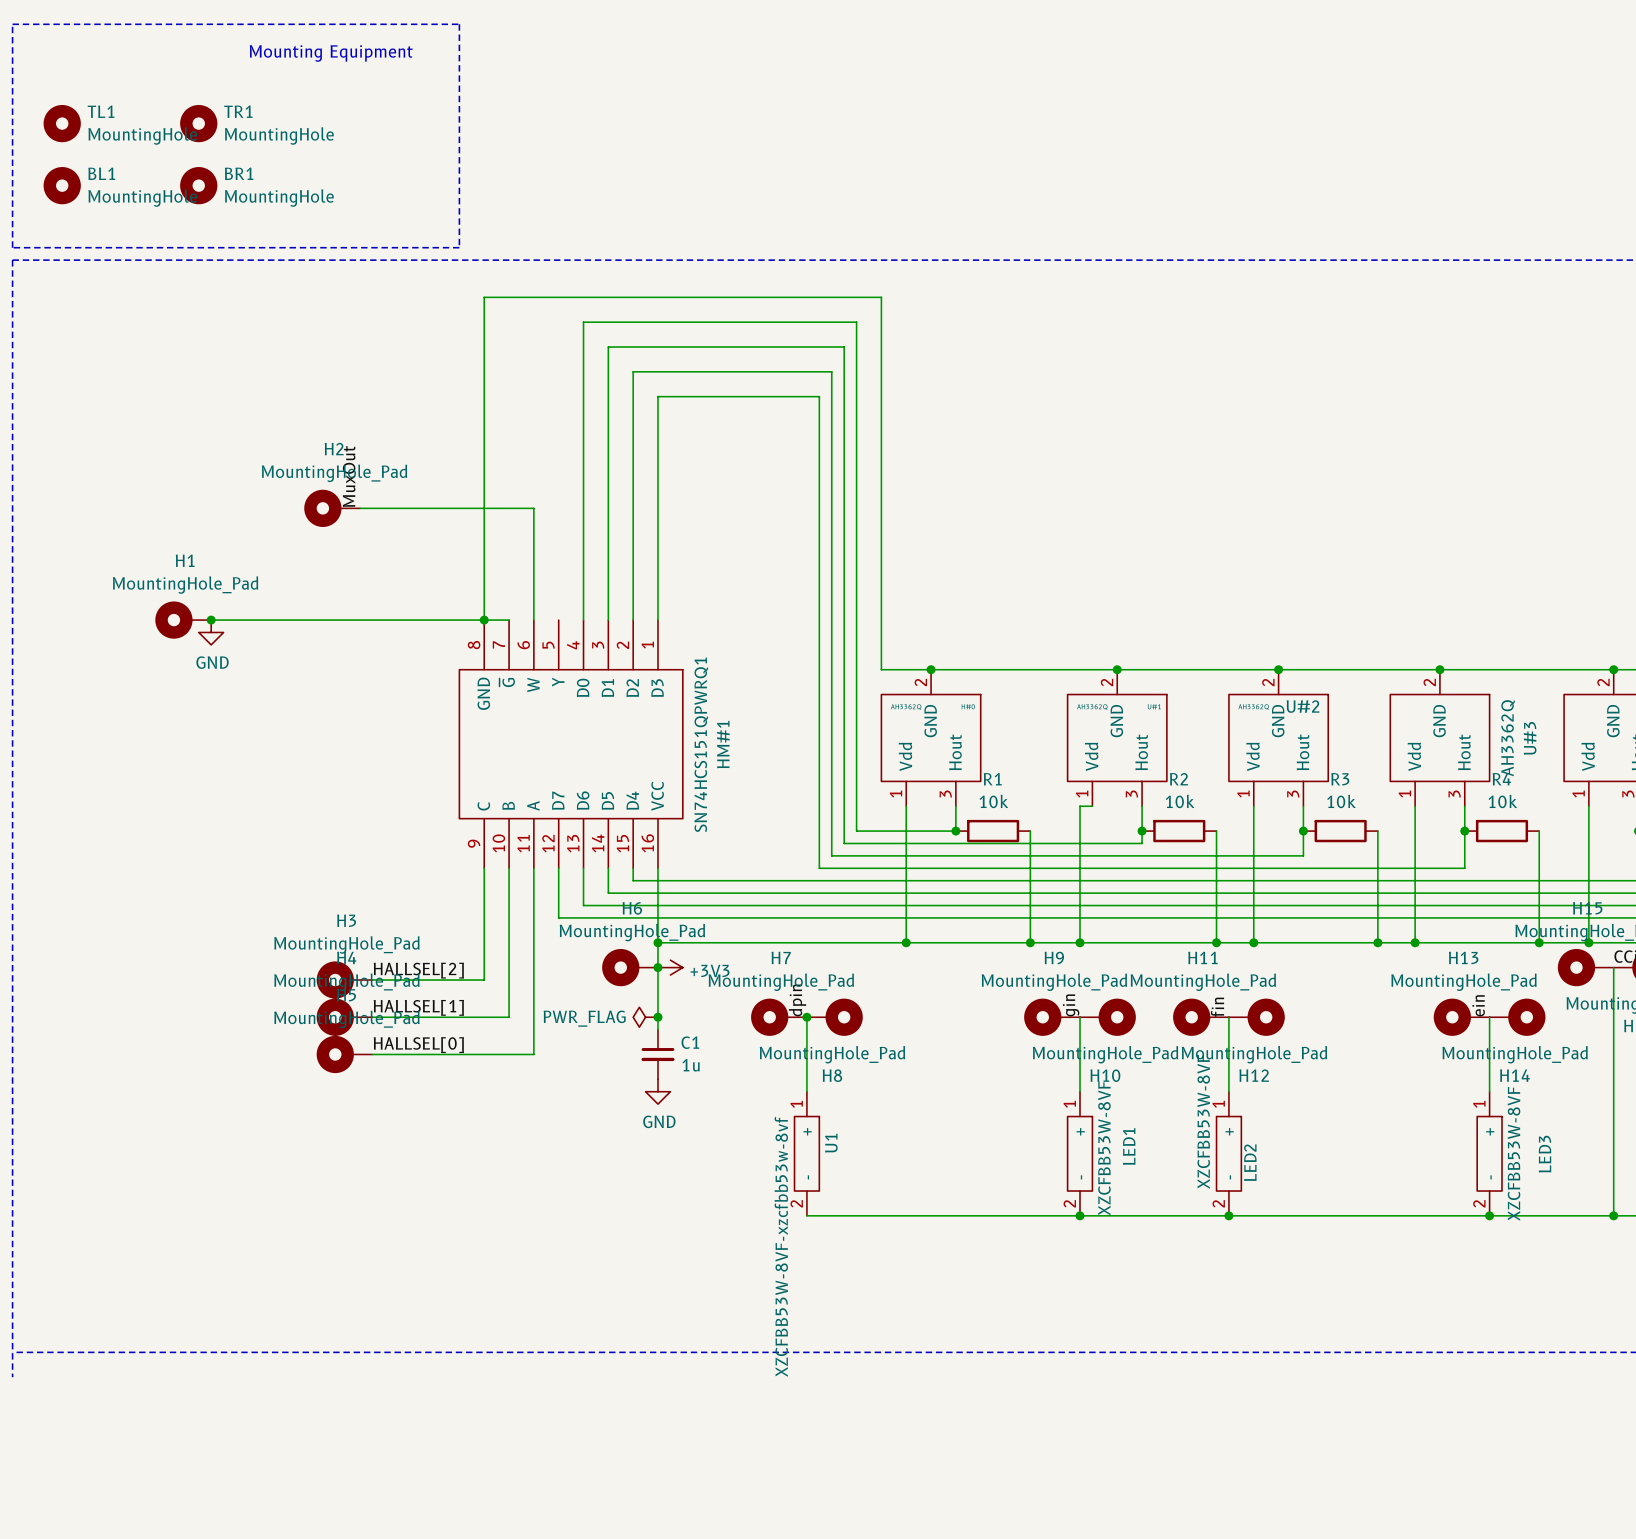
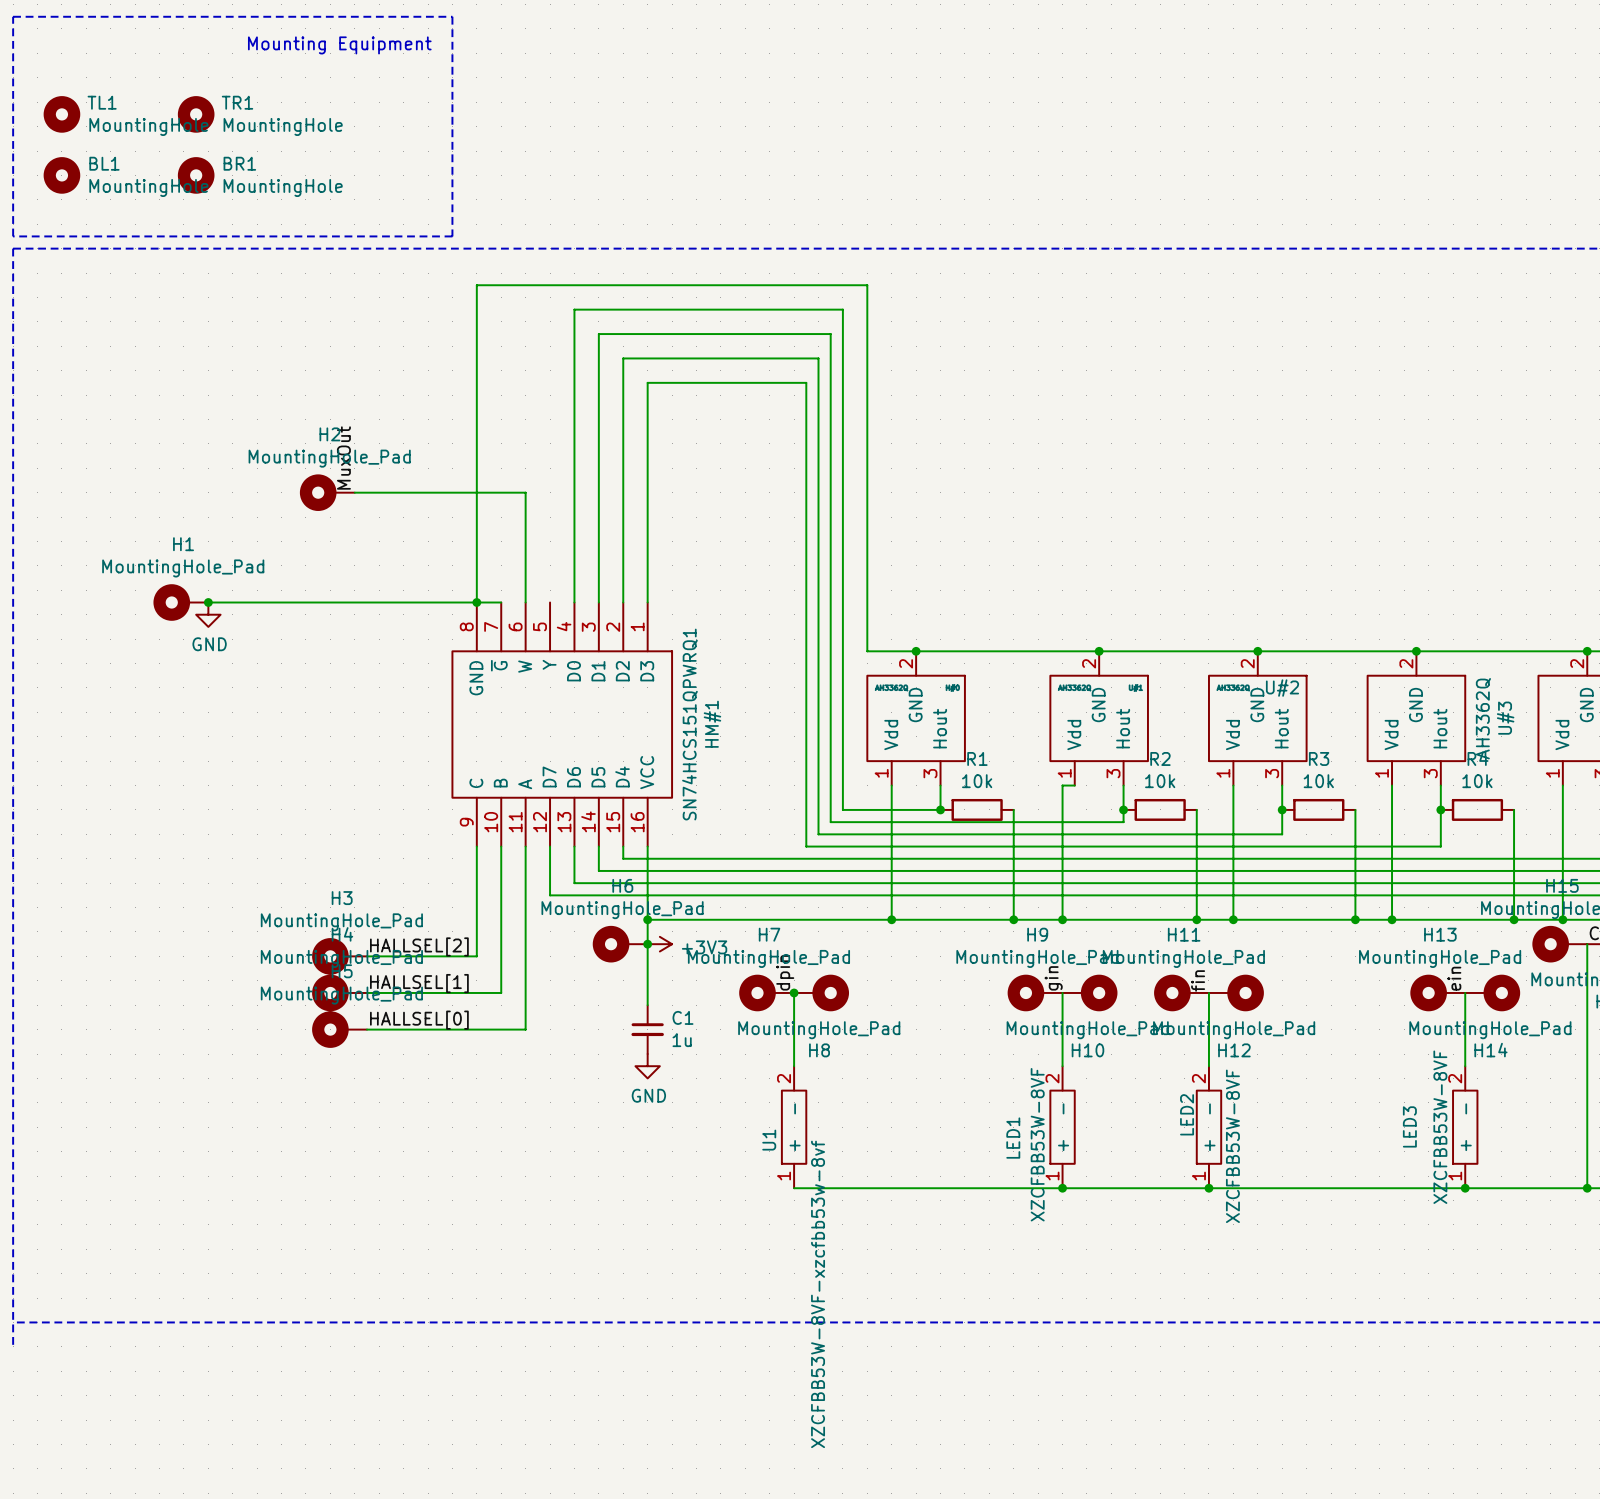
power symbol: PWR_FLAG (645, 1017) -> none
junction: (657, 1017) -> none
U1 rotation: 0° (806, 1153) -> 180° (794, 1127)
LED1 rotation: 0° (1079, 1153) -> 180° (1062, 1127)
LED2 rotation: 0° (1228, 1153) -> 180° (1208, 1127)
LED3 rotation: 0° (1489, 1153) -> 180° (1465, 1127)
U1 value position: XZCFBB53W-8VF-xzcfbb53w-8vf (781, 1246) -> XZCFBB53W-8VF-xzcfbb53w-8vf (818, 1294)

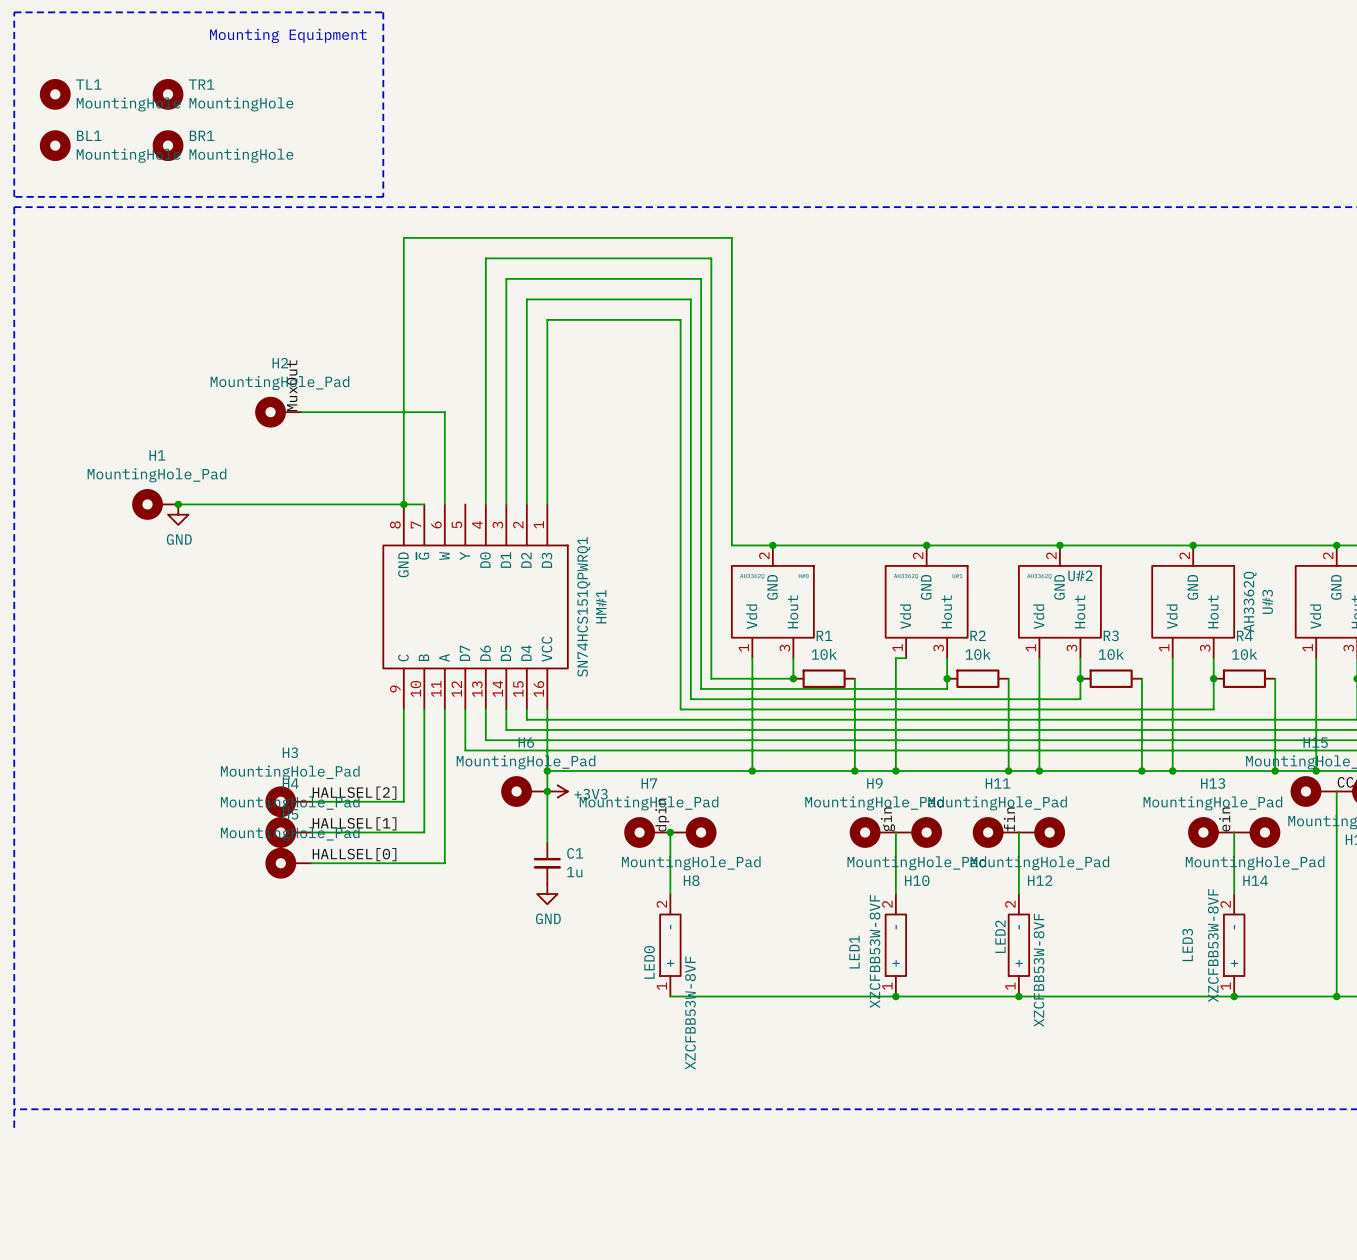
U1 name: U1 (769, 1140) -> LED0 (649, 962)
U1 value: XZCFBB53W-8VF-xzcfbb53w-8vf (818, 1294) -> XZCFBB53W-8VF (690, 1013)

